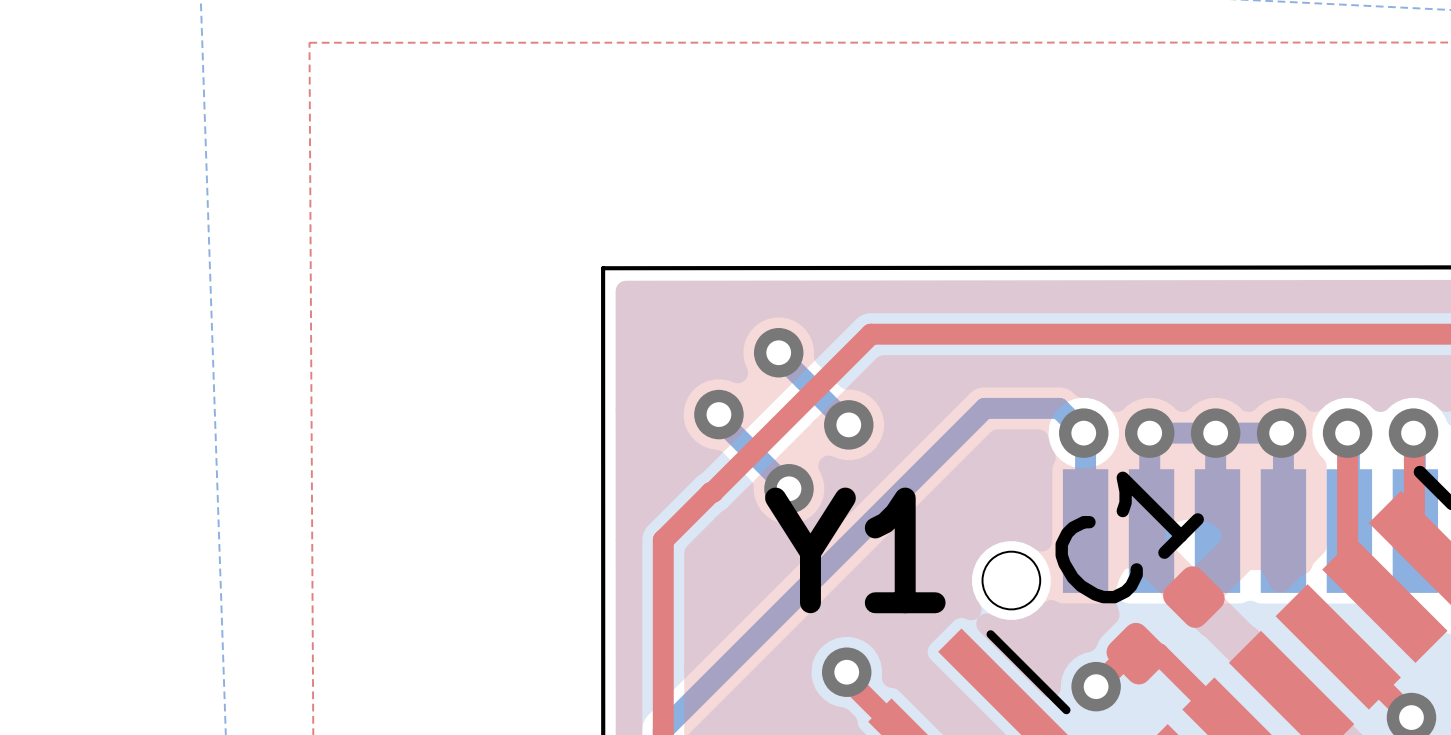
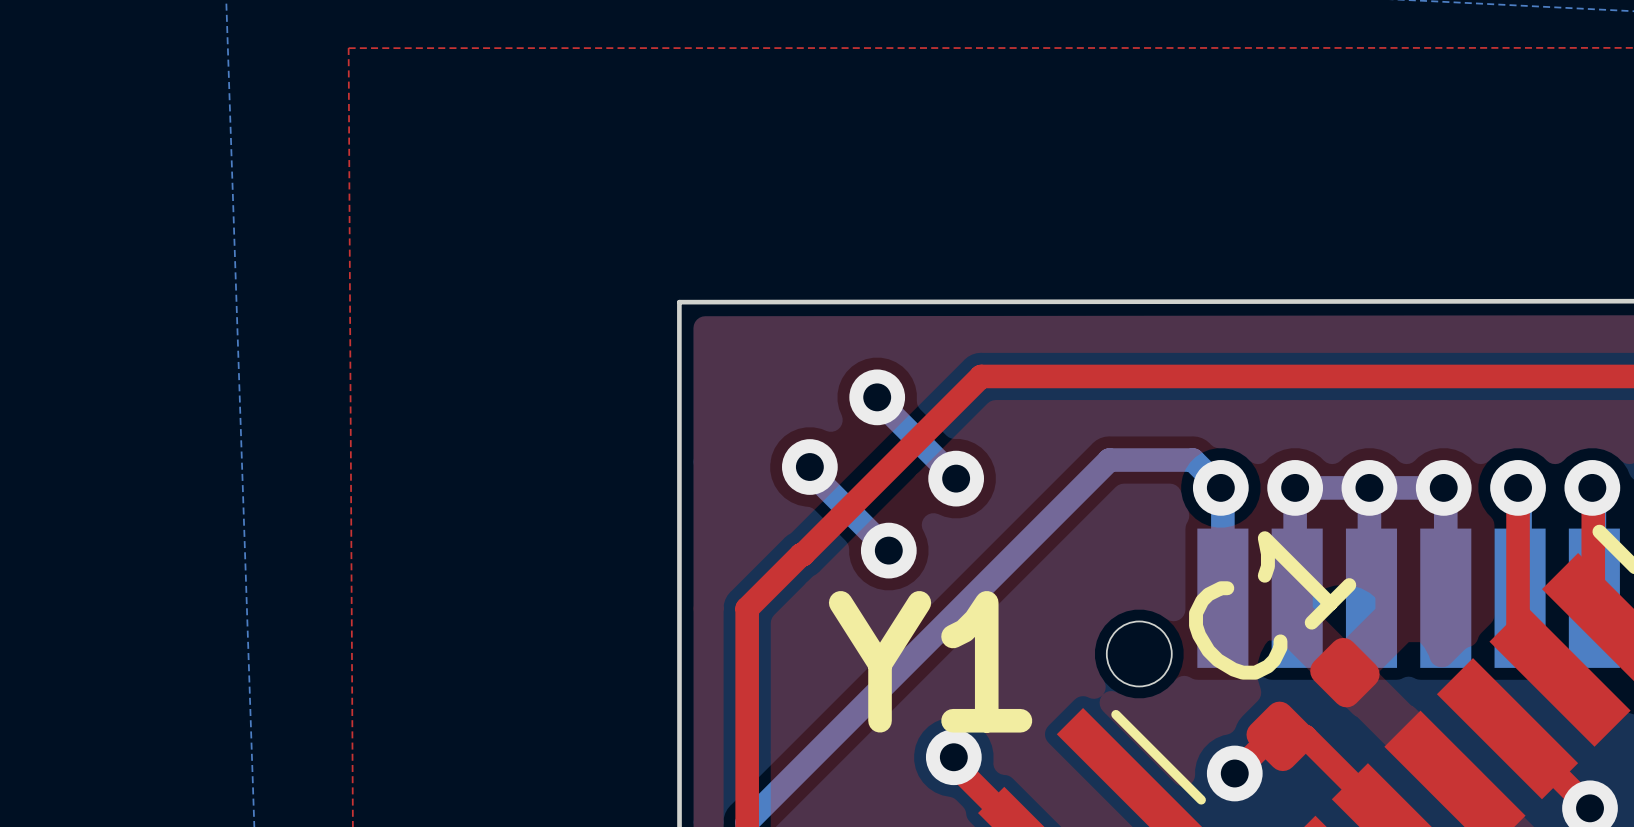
Y1 name position: Y1 (855, 550) -> Y1 (930, 661)

